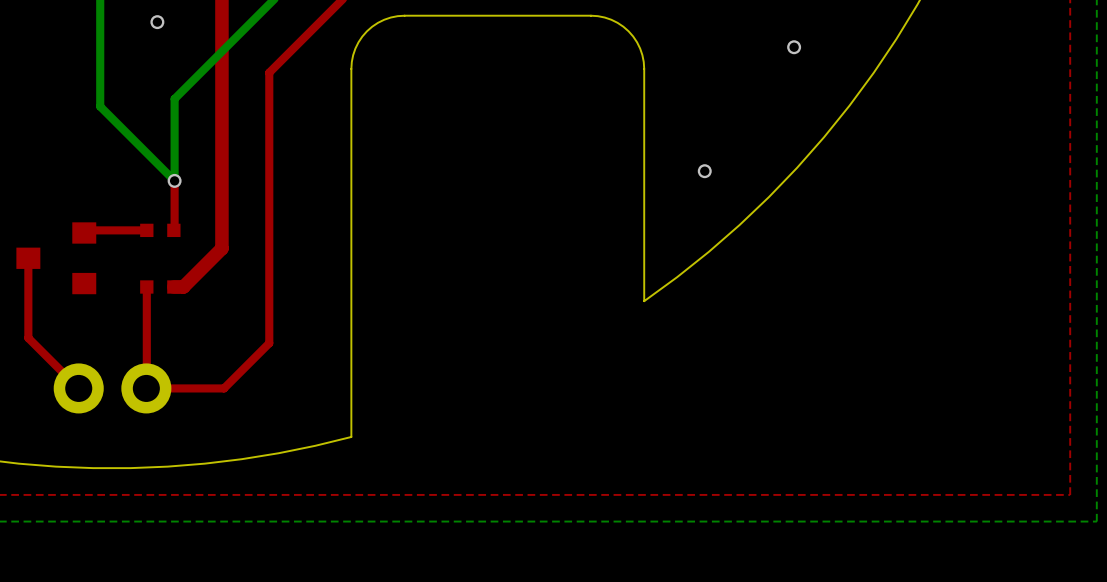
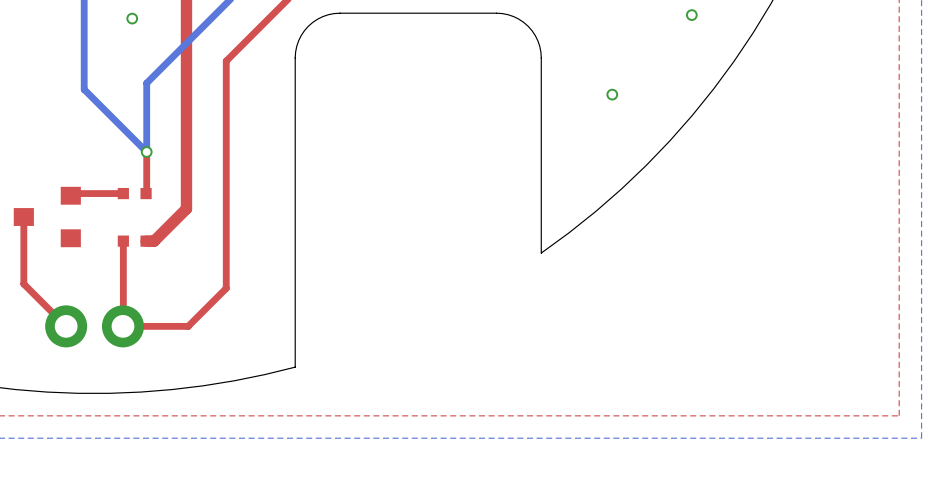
via position: (794, 47) -> (691, 15)
via: none -> (612, 94)
via: (704, 171) -> none

